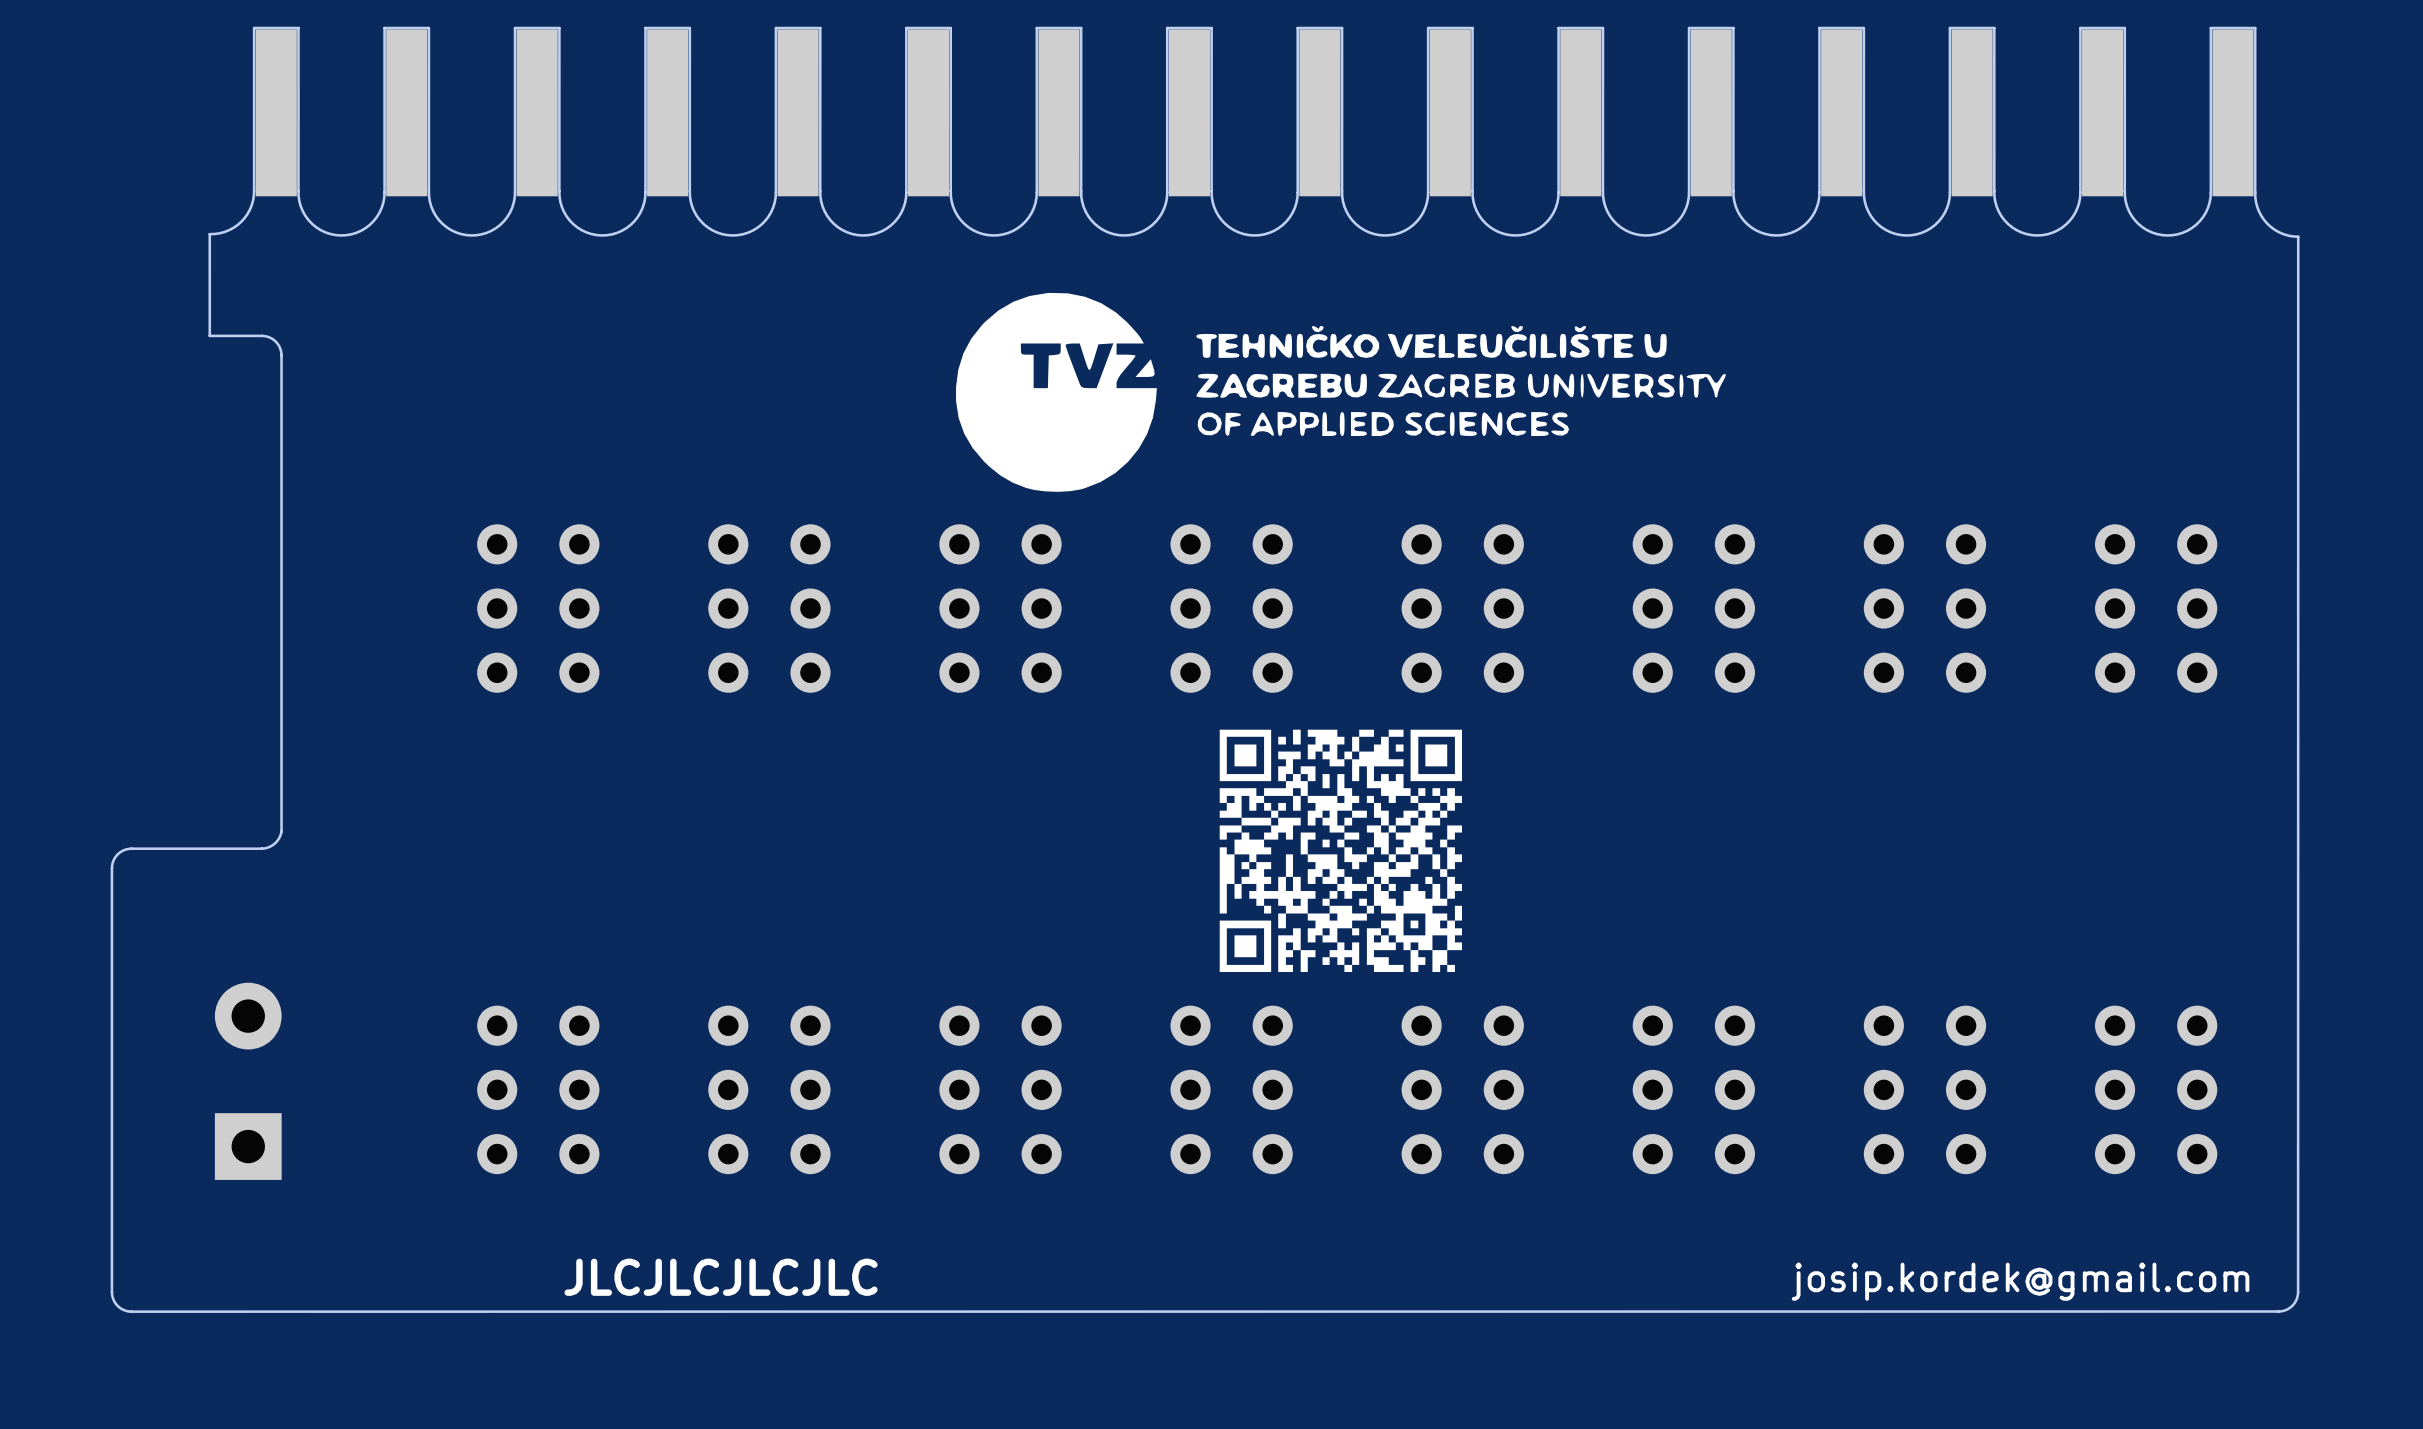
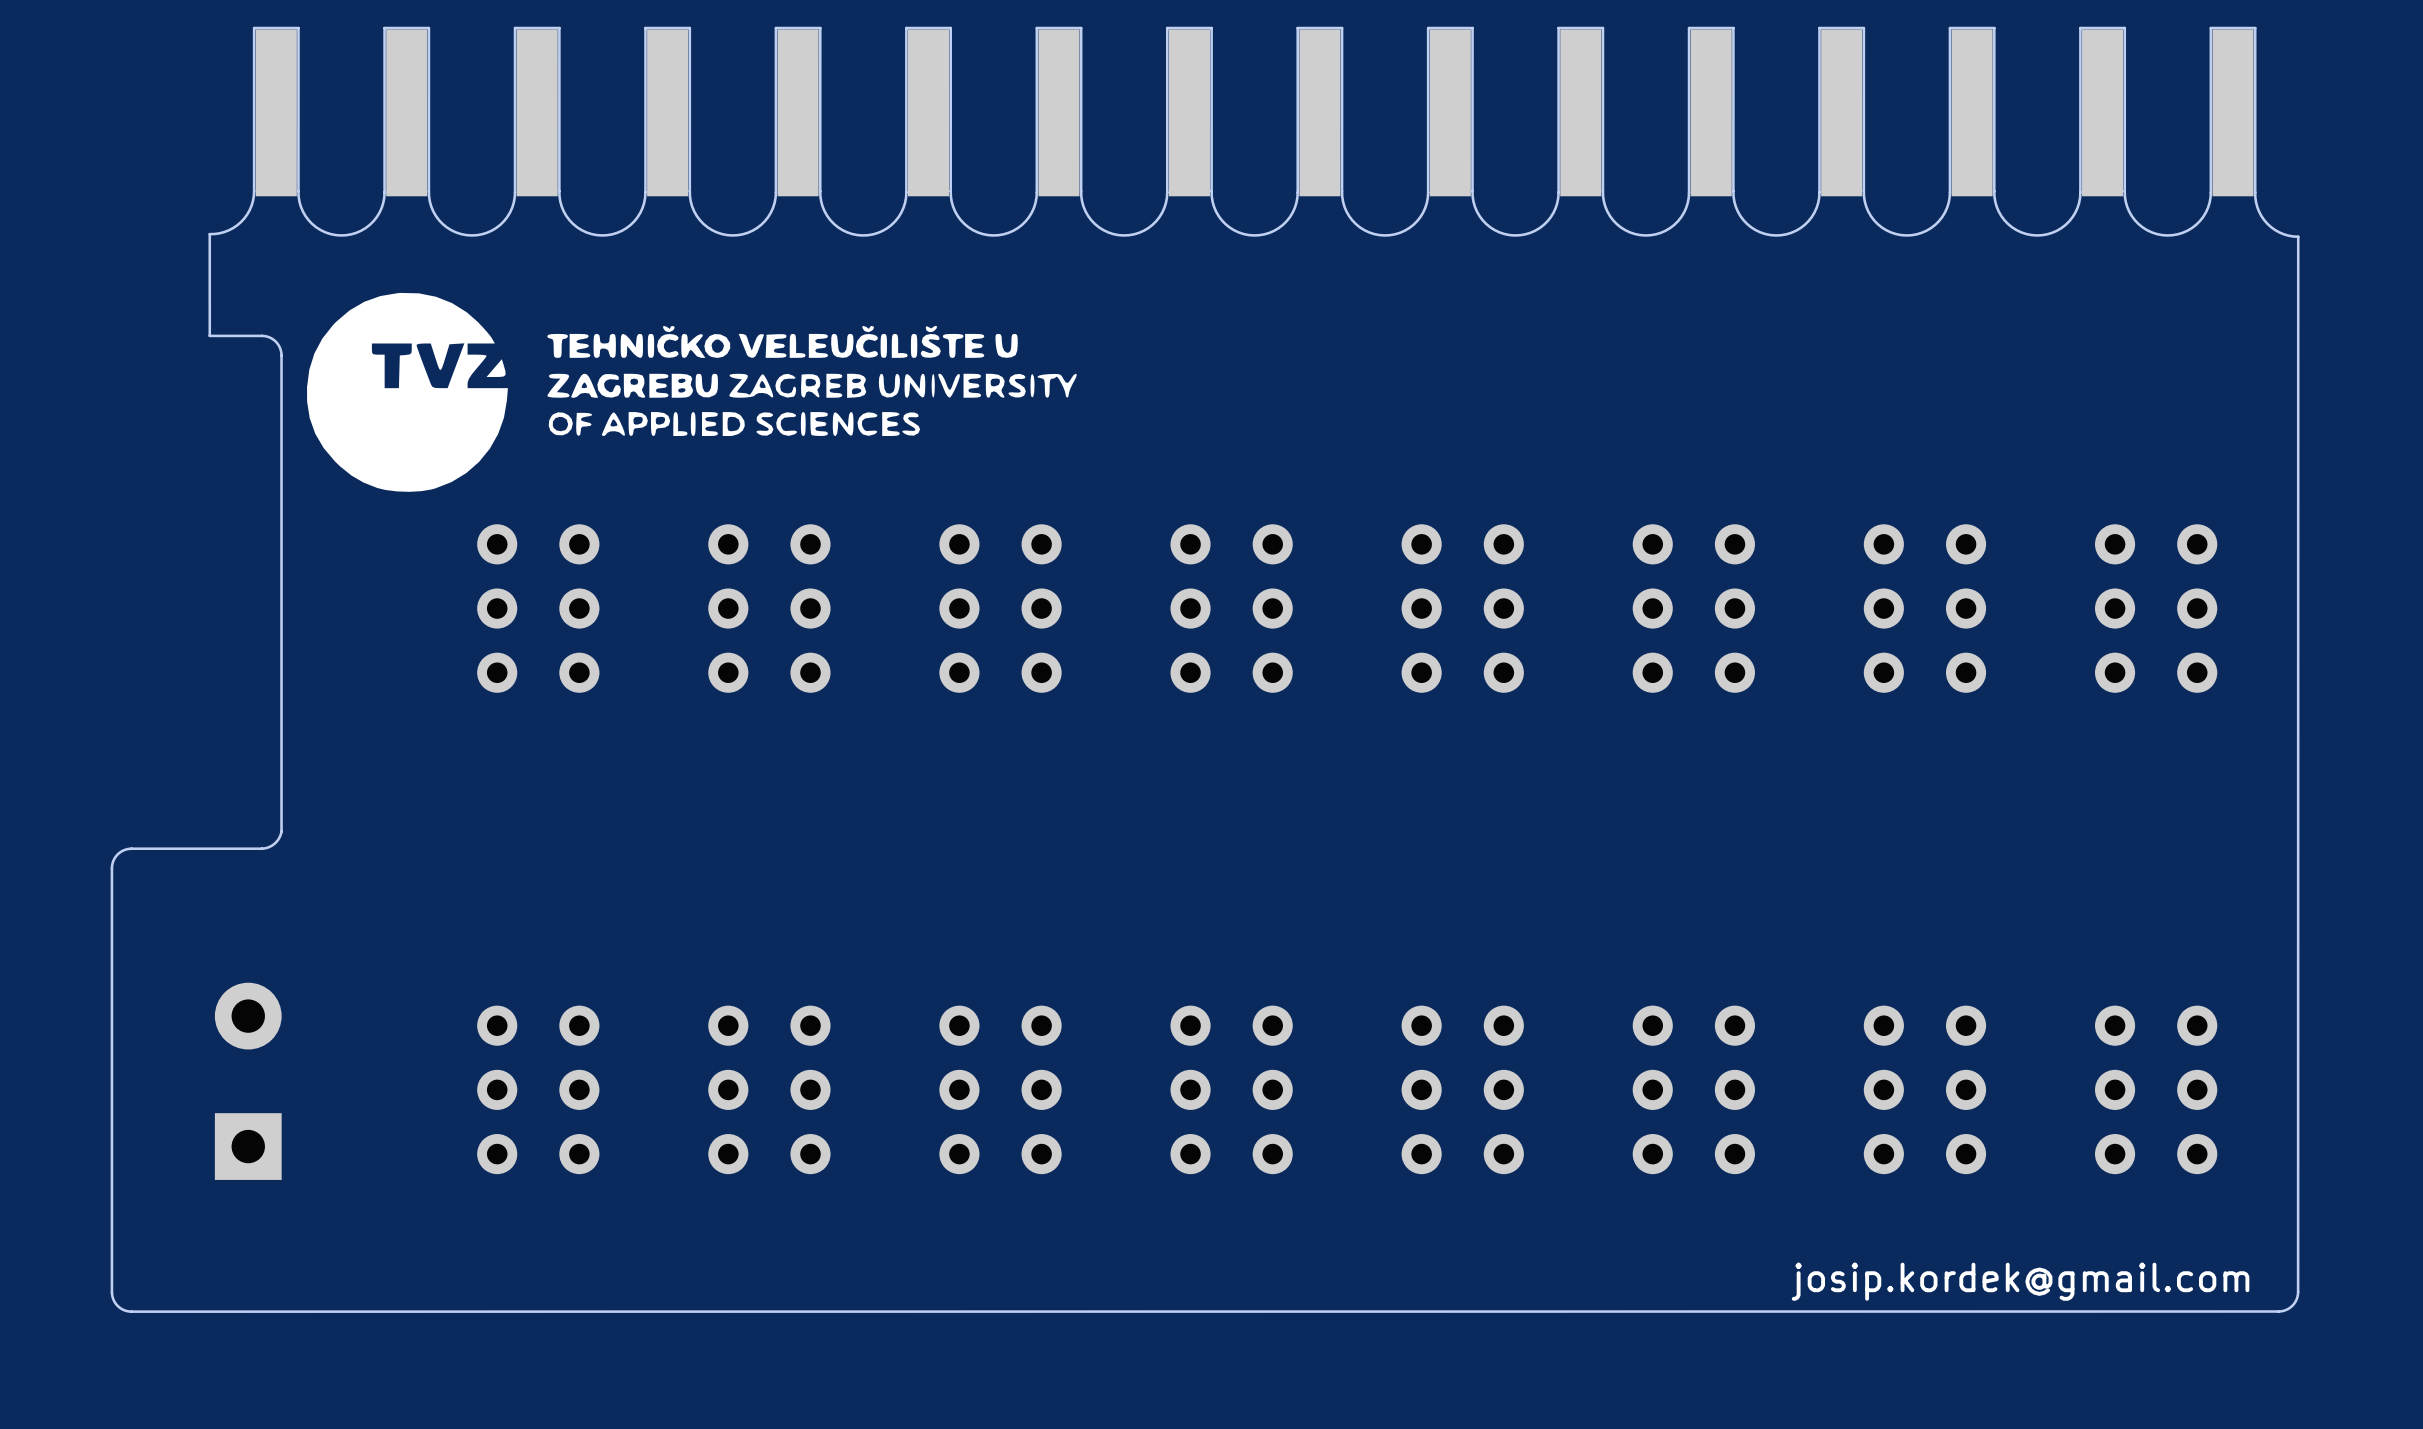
drawing: none -> [307, 292, 1077, 492]
drawing: [955, 292, 1726, 492] -> none
drawing: [1219, 729, 1463, 972] -> none
text: JLCJLCJLCJLC (721, 1277) -> none

